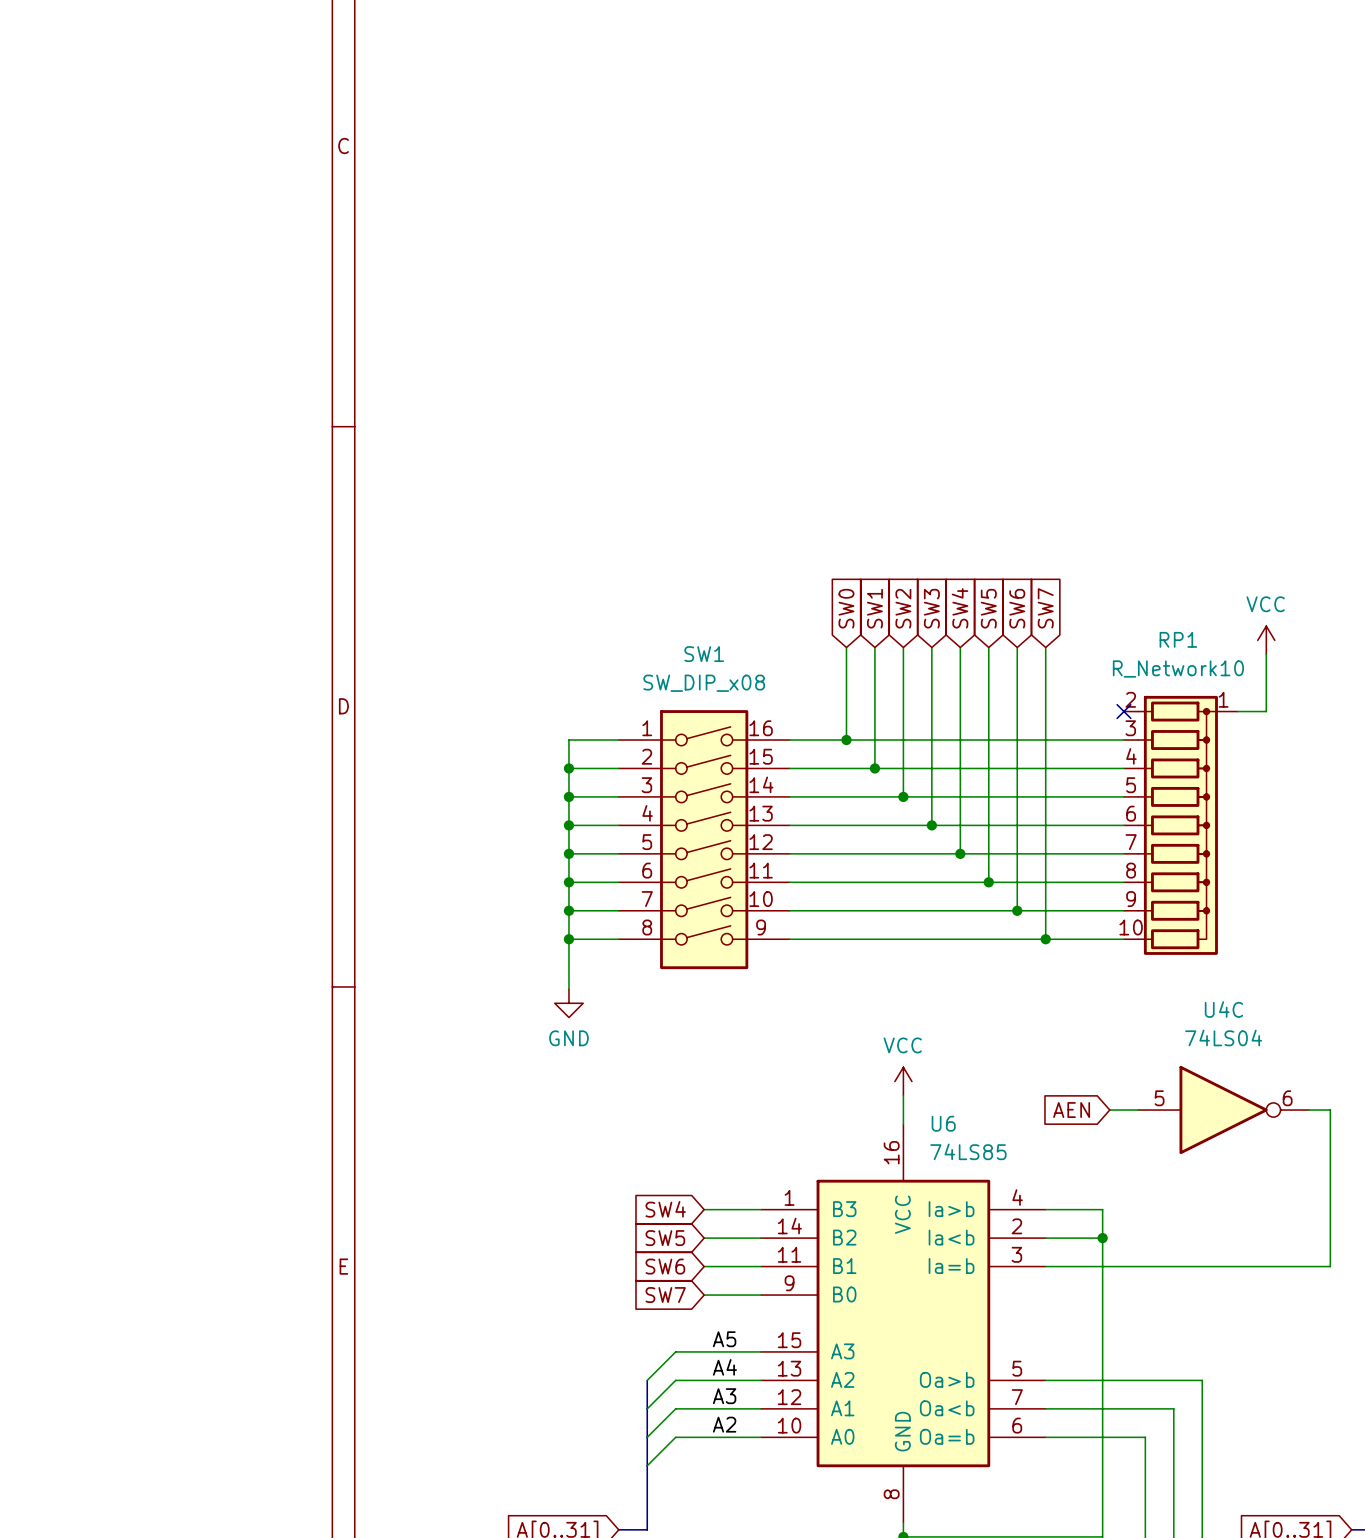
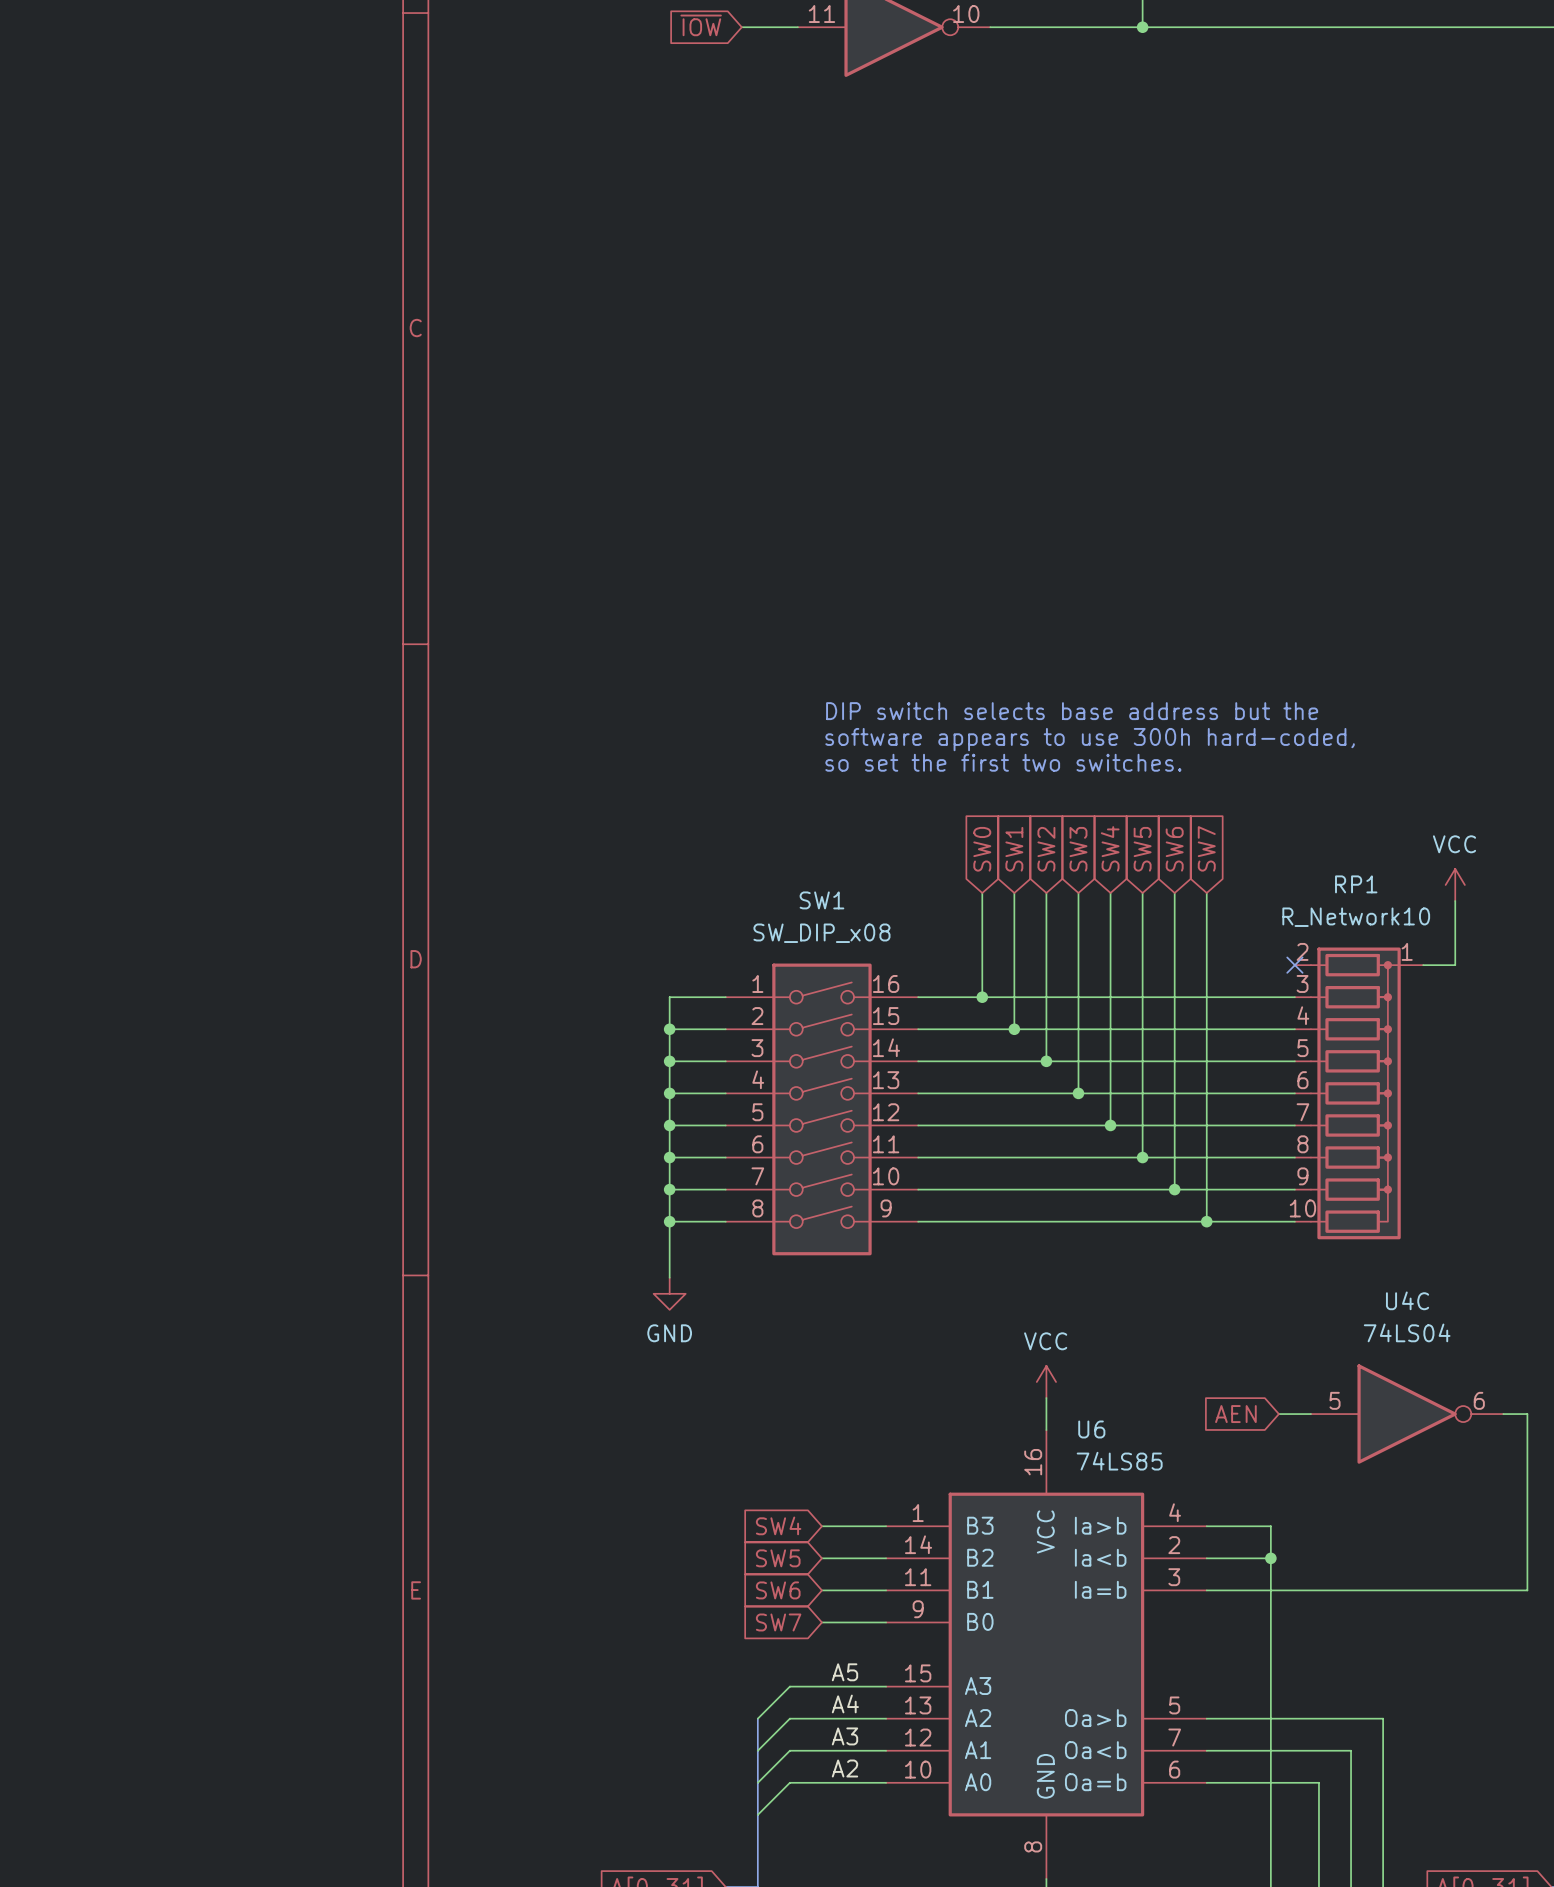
text: none -> DIP switch selects base address but the (1072, 711)
text: none -> software appears to use 300h hard-coded, (1090, 739)
text: none -> so set the first two switches. (1003, 762)

